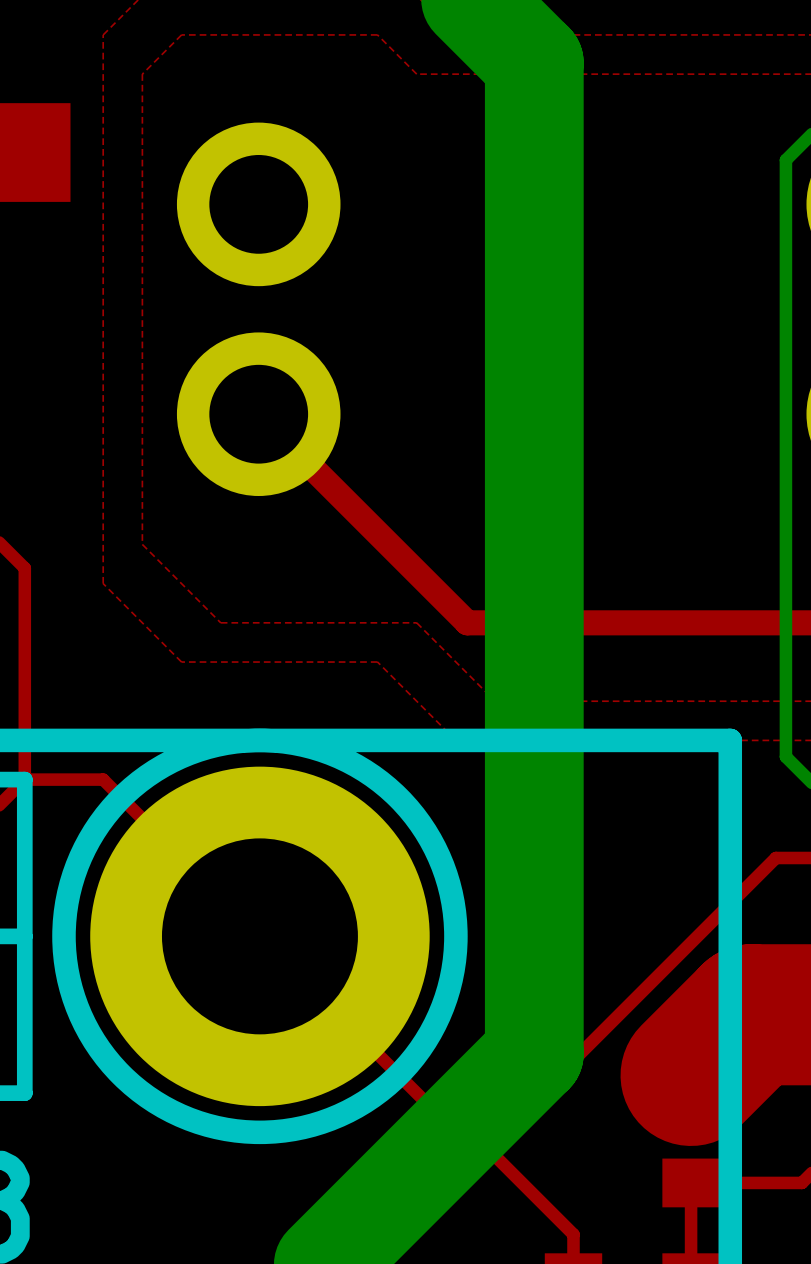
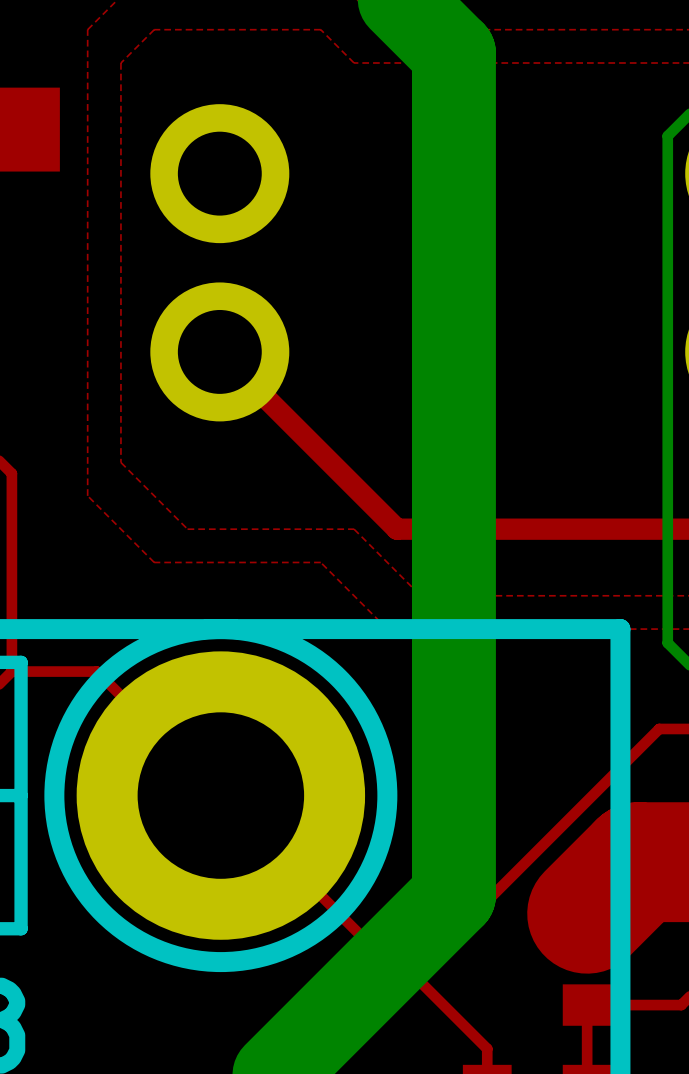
top track: (14, 557) (24, 568) (24, 779) -> (11, 473) (11, 671) (96, 671)
top track: (24, 779) (103, 779) (113, 790) -> none

